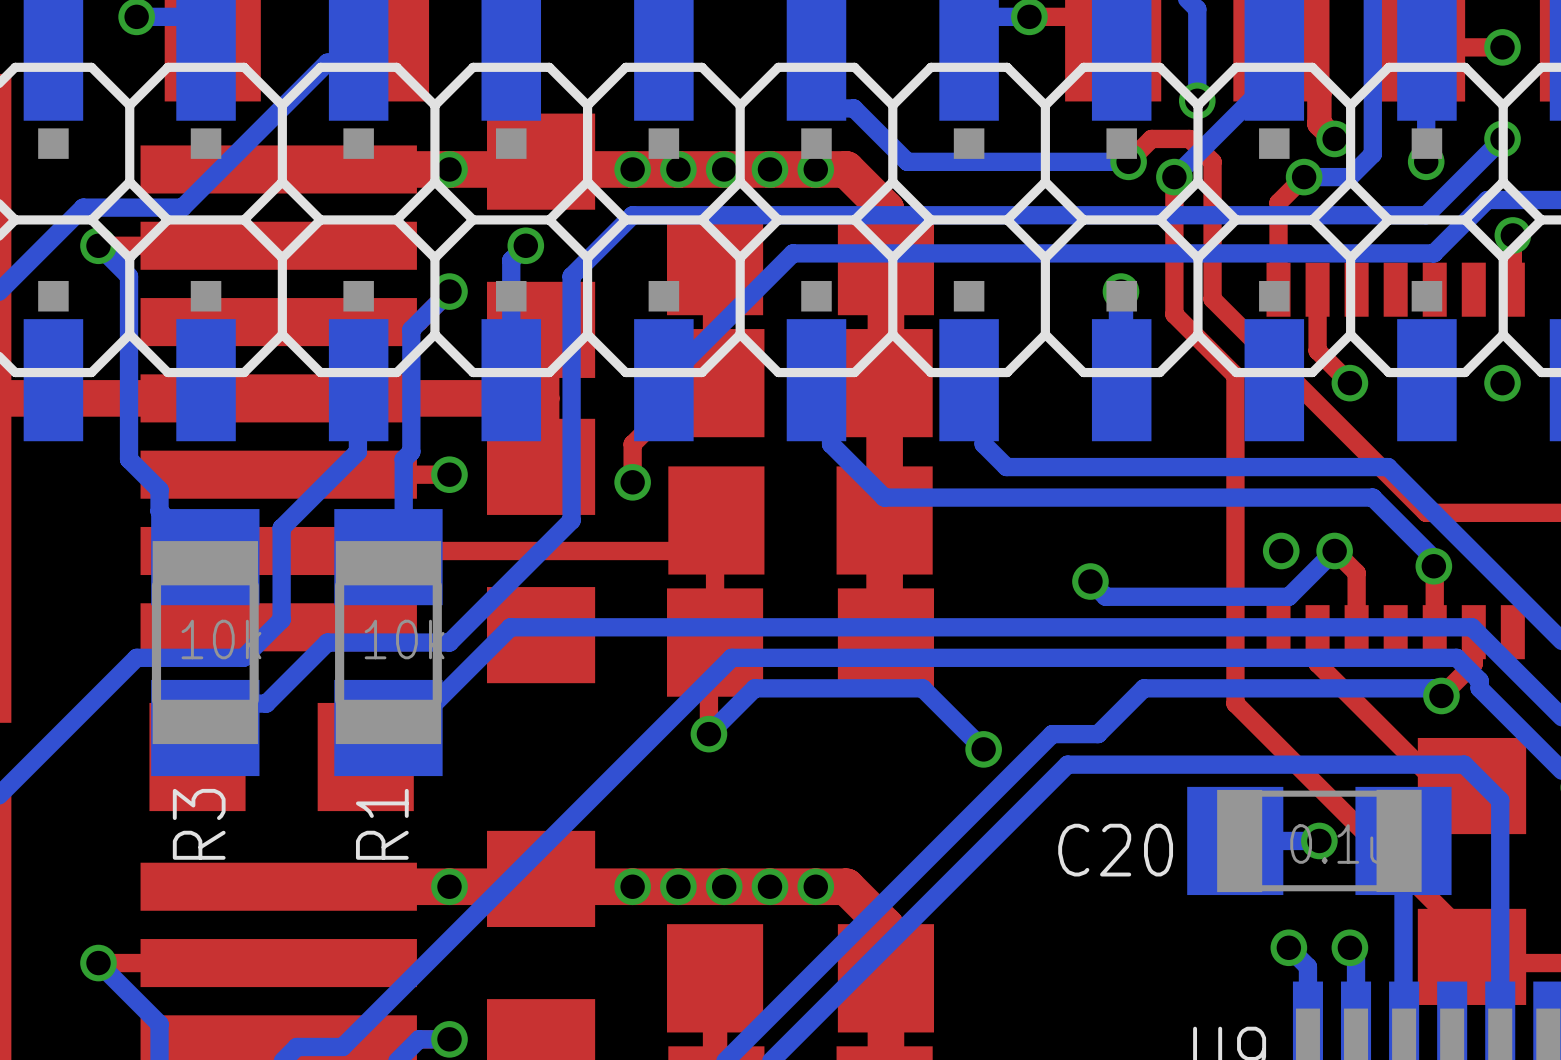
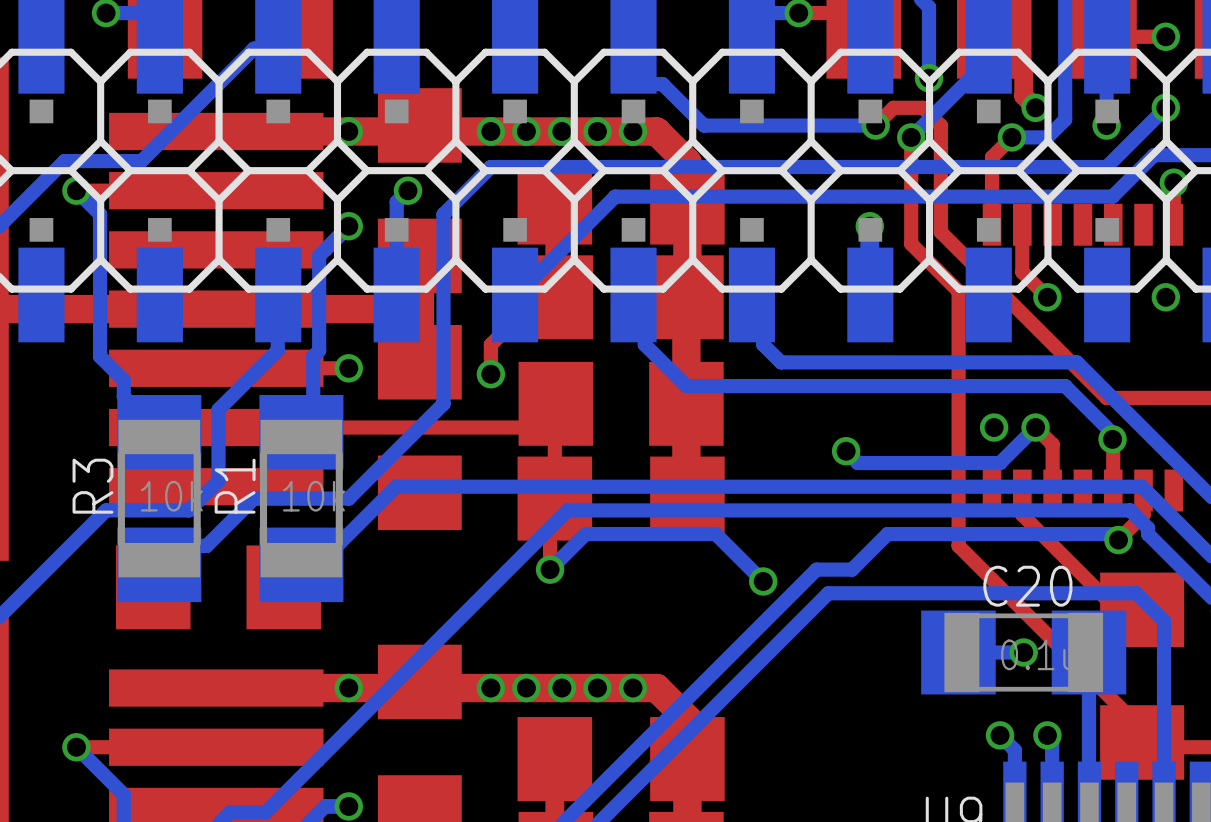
R3 name position: R3 (199, 824) -> R3 (93, 486)
R1 name position: R1 (382, 824) -> R1 (235, 486)
C20 name position: C20 (1115, 850) -> C20 (1027, 586)

